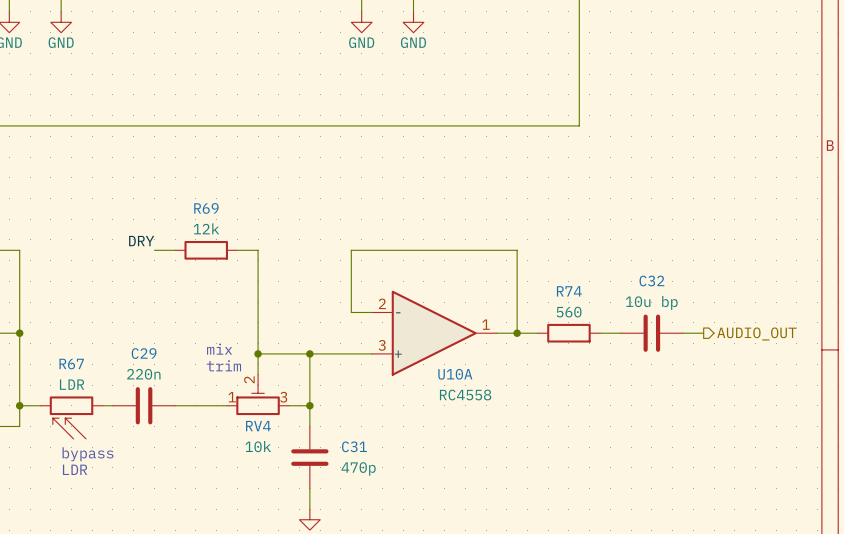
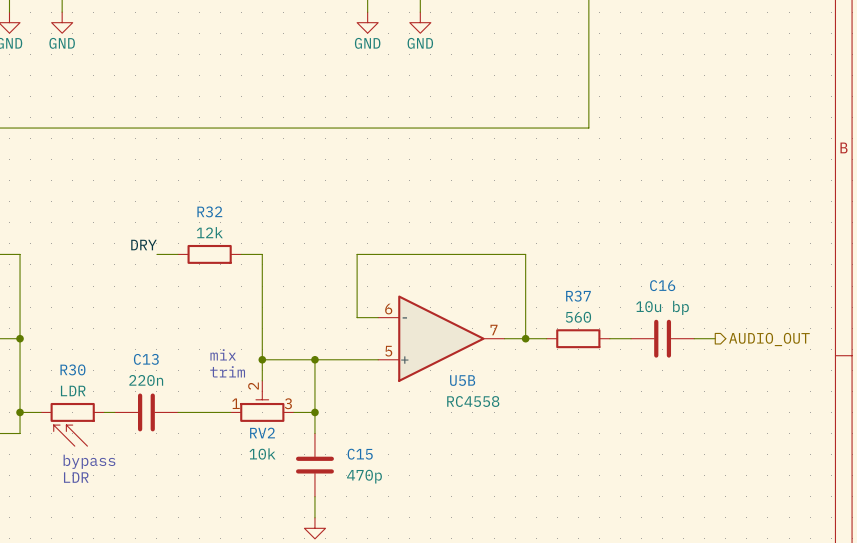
R69 name: R69 (206, 208) -> R32 (209, 211)
C32 name: C32 (651, 281) -> C16 (662, 285)
R74 name: R74 (569, 291) -> R37 (578, 296)
U10A pin number: 2 (382, 303) -> 6 (388, 309)
U10A pin number: 1 (486, 324) -> 7 (494, 330)
U10A pin number: 3 (382, 345) -> 5 (388, 351)
C29 name: C29 (144, 353) -> C13 (146, 359)
R67 name: R67 (71, 364) -> R30 (72, 369)
U10A name: U10A (455, 374) -> U5B (462, 380)
RV4 name: RV4 (258, 426) -> RV2 (262, 433)
C31 name: C31 (354, 446) -> C15 (360, 454)

